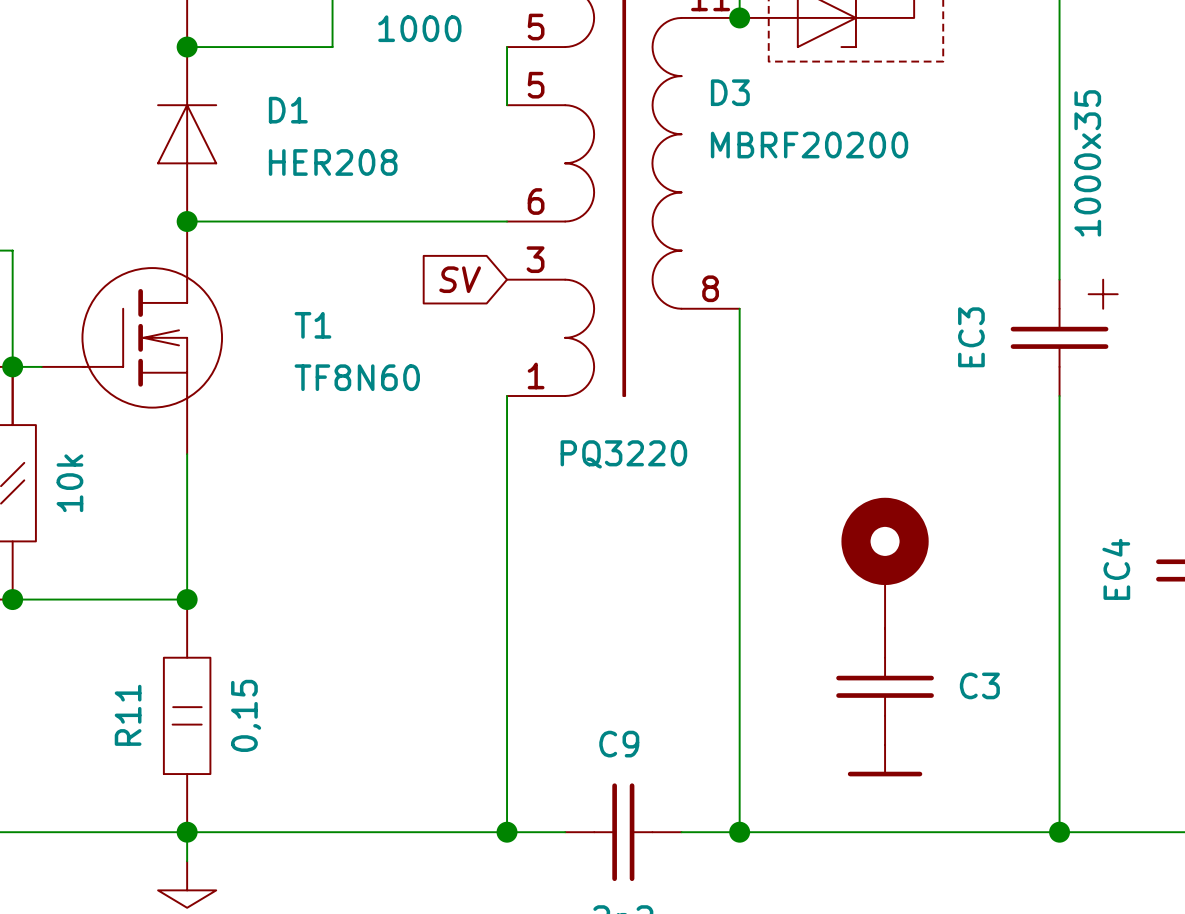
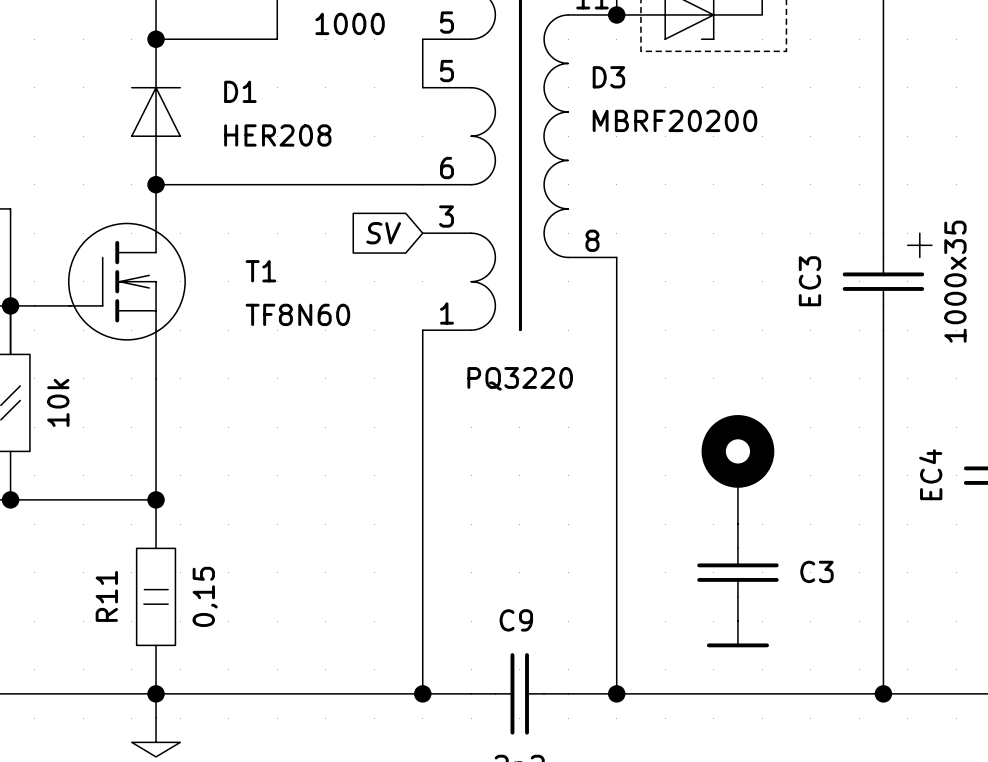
EC3 value position: 1000x35 (1087, 163) -> 1000x35 (955, 281)

